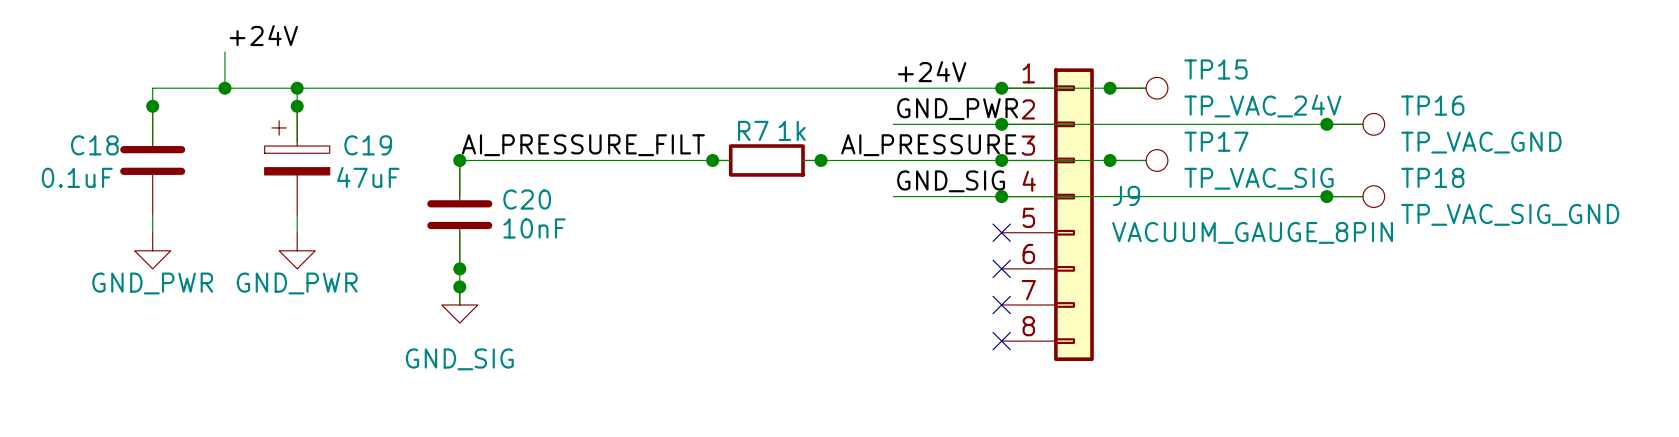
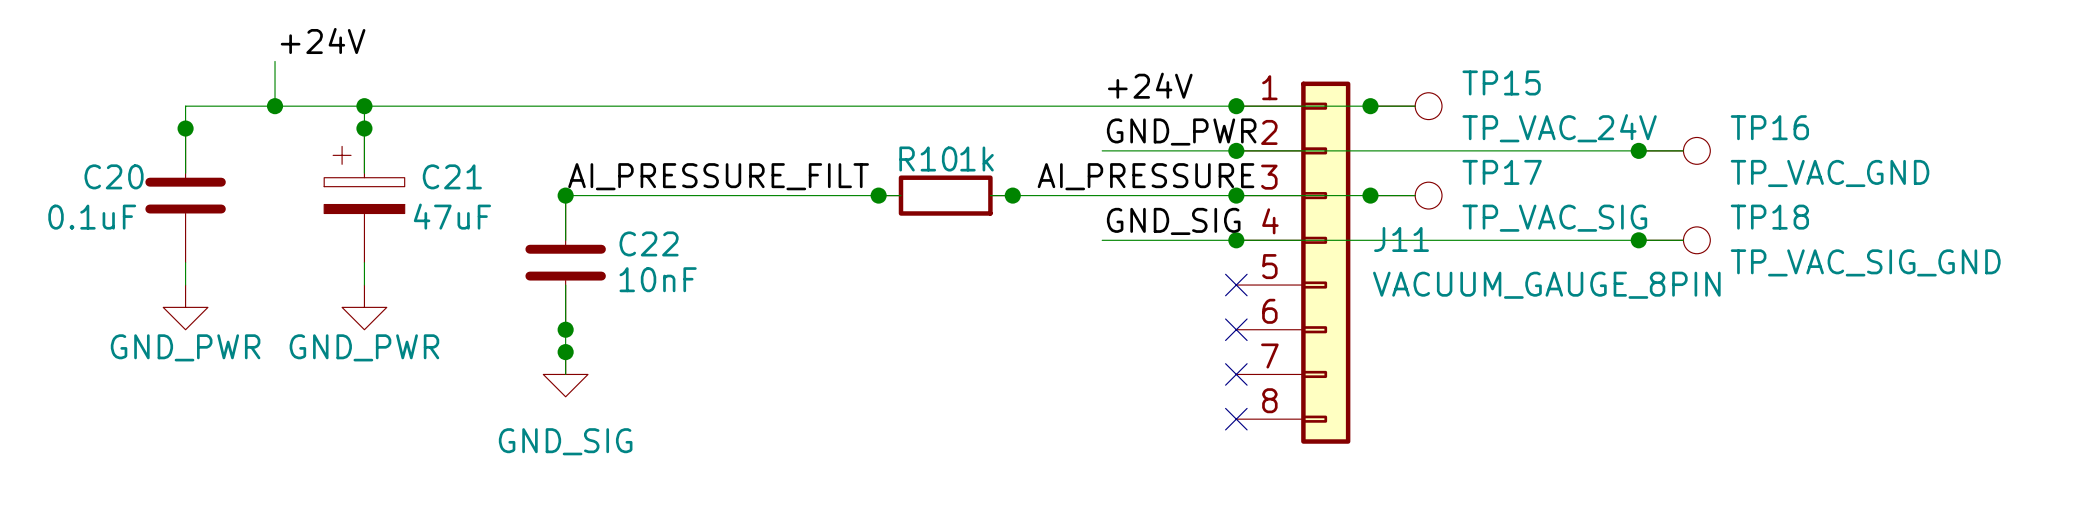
R7 name: R7 (753, 130) -> R10 (928, 158)
C18 name: C18 (94, 145) -> C20 (114, 176)
C19 name: C19 (368, 145) -> C21 (452, 176)
J9 name: J9 (1126, 195) -> J11 (1401, 239)
C20 name: C20 (527, 199) -> C22 (649, 243)

